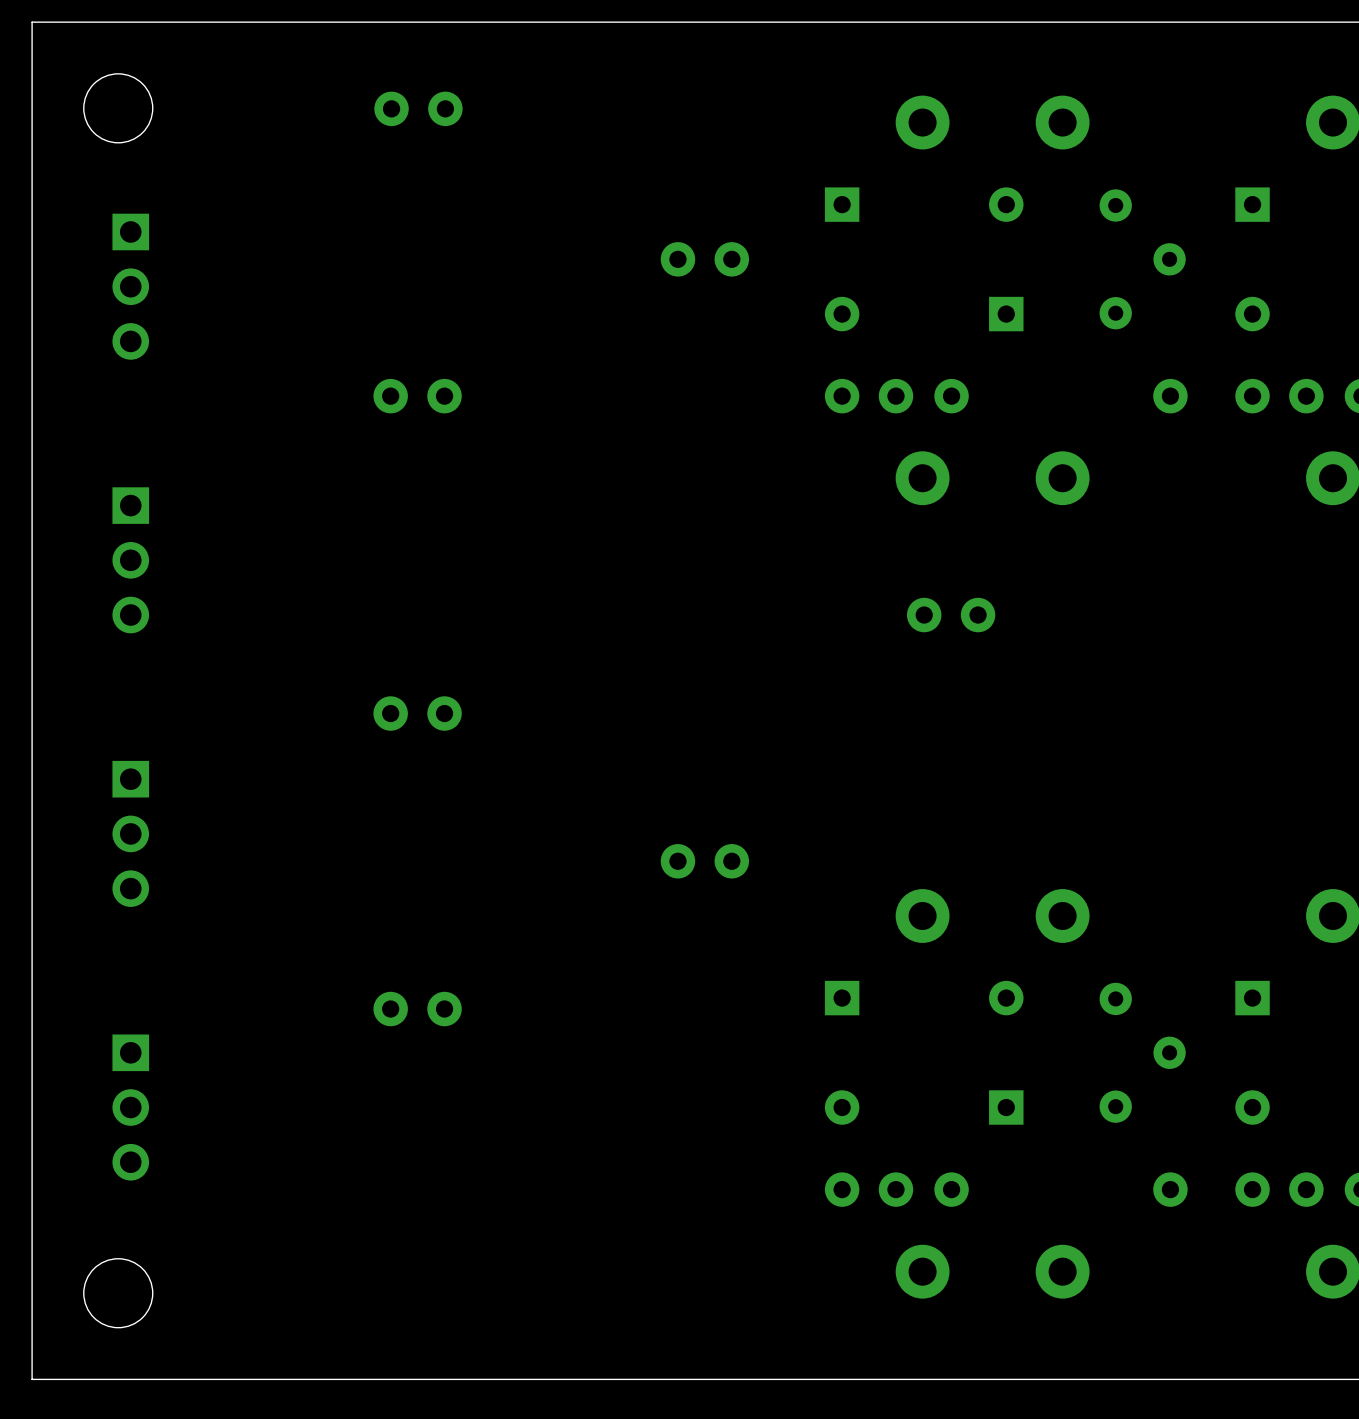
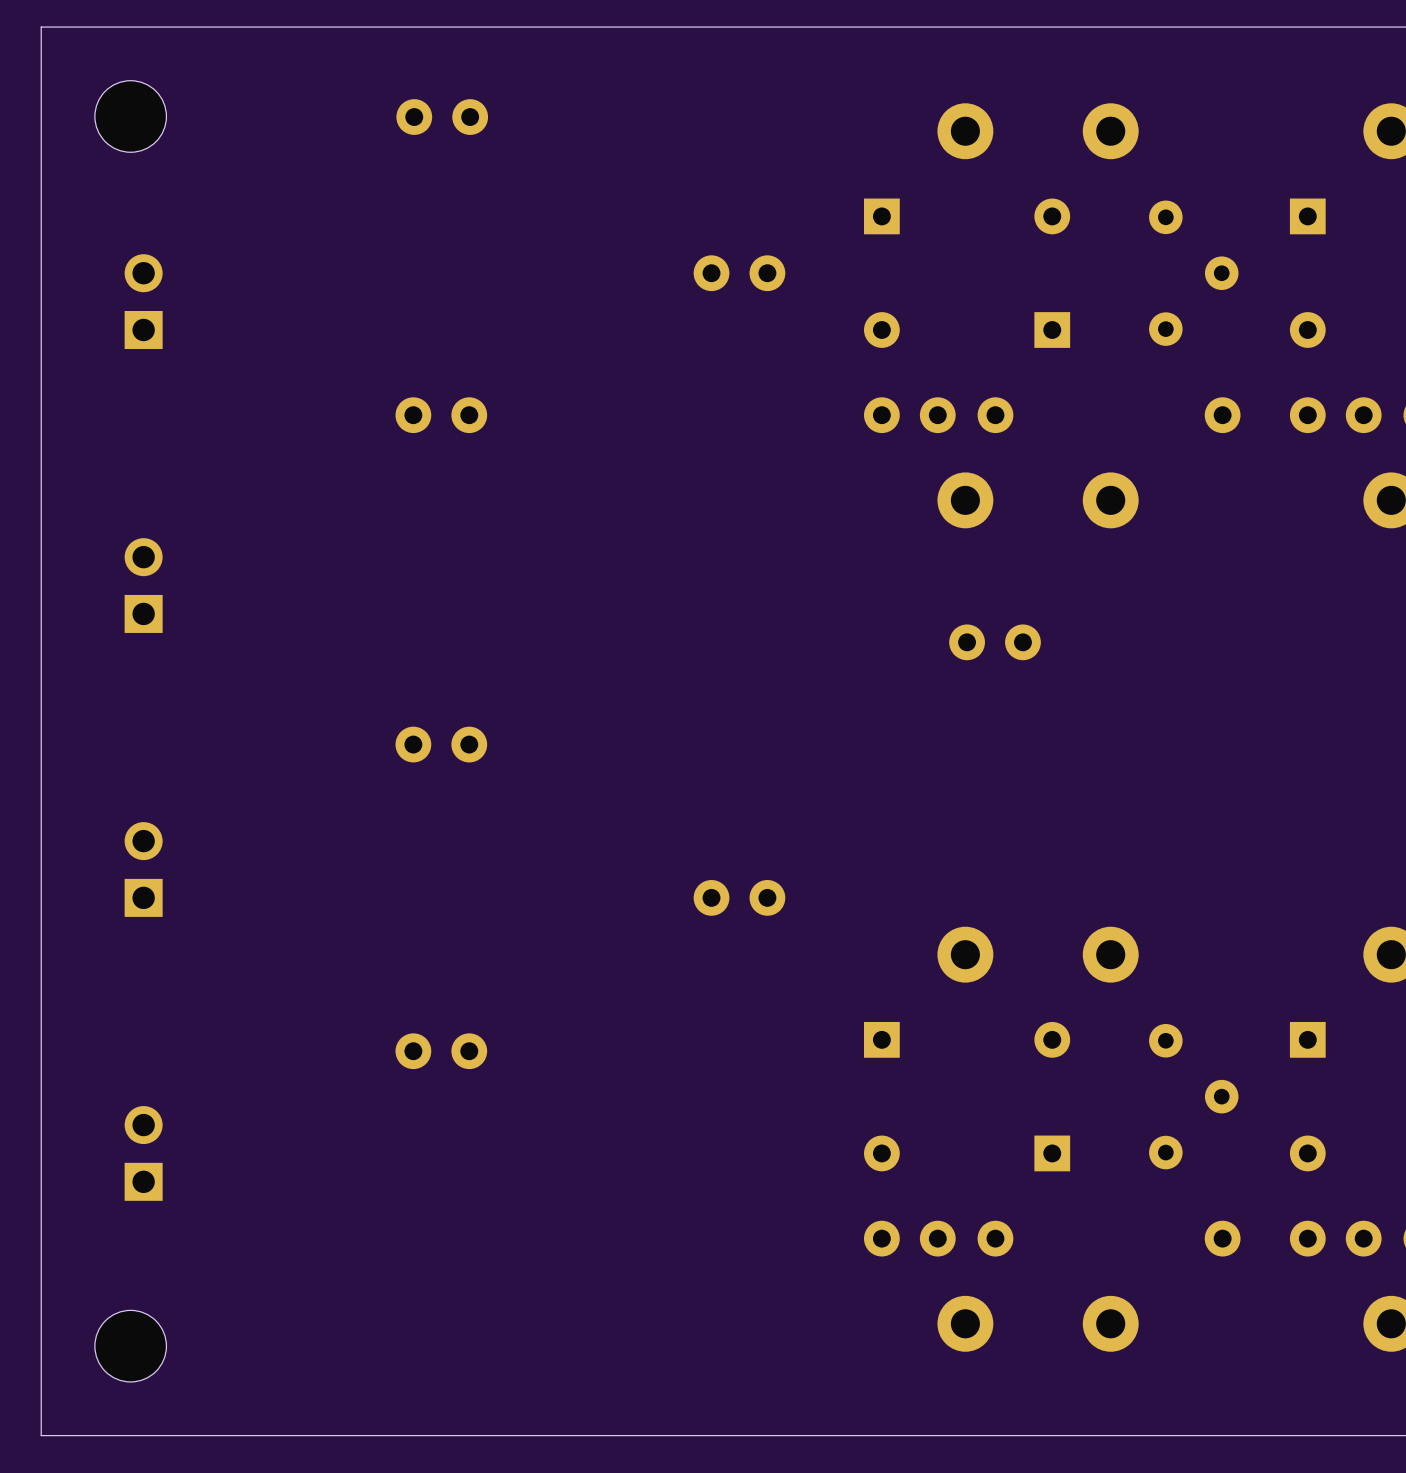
part footprint: [112, 213, 150, 360] -> [124, 254, 163, 350]
part footprint: [112, 487, 150, 634] -> [124, 538, 163, 633]
part footprint: [112, 760, 150, 907] -> [124, 822, 163, 917]
part footprint: [112, 1034, 150, 1181] -> [124, 1106, 163, 1201]

